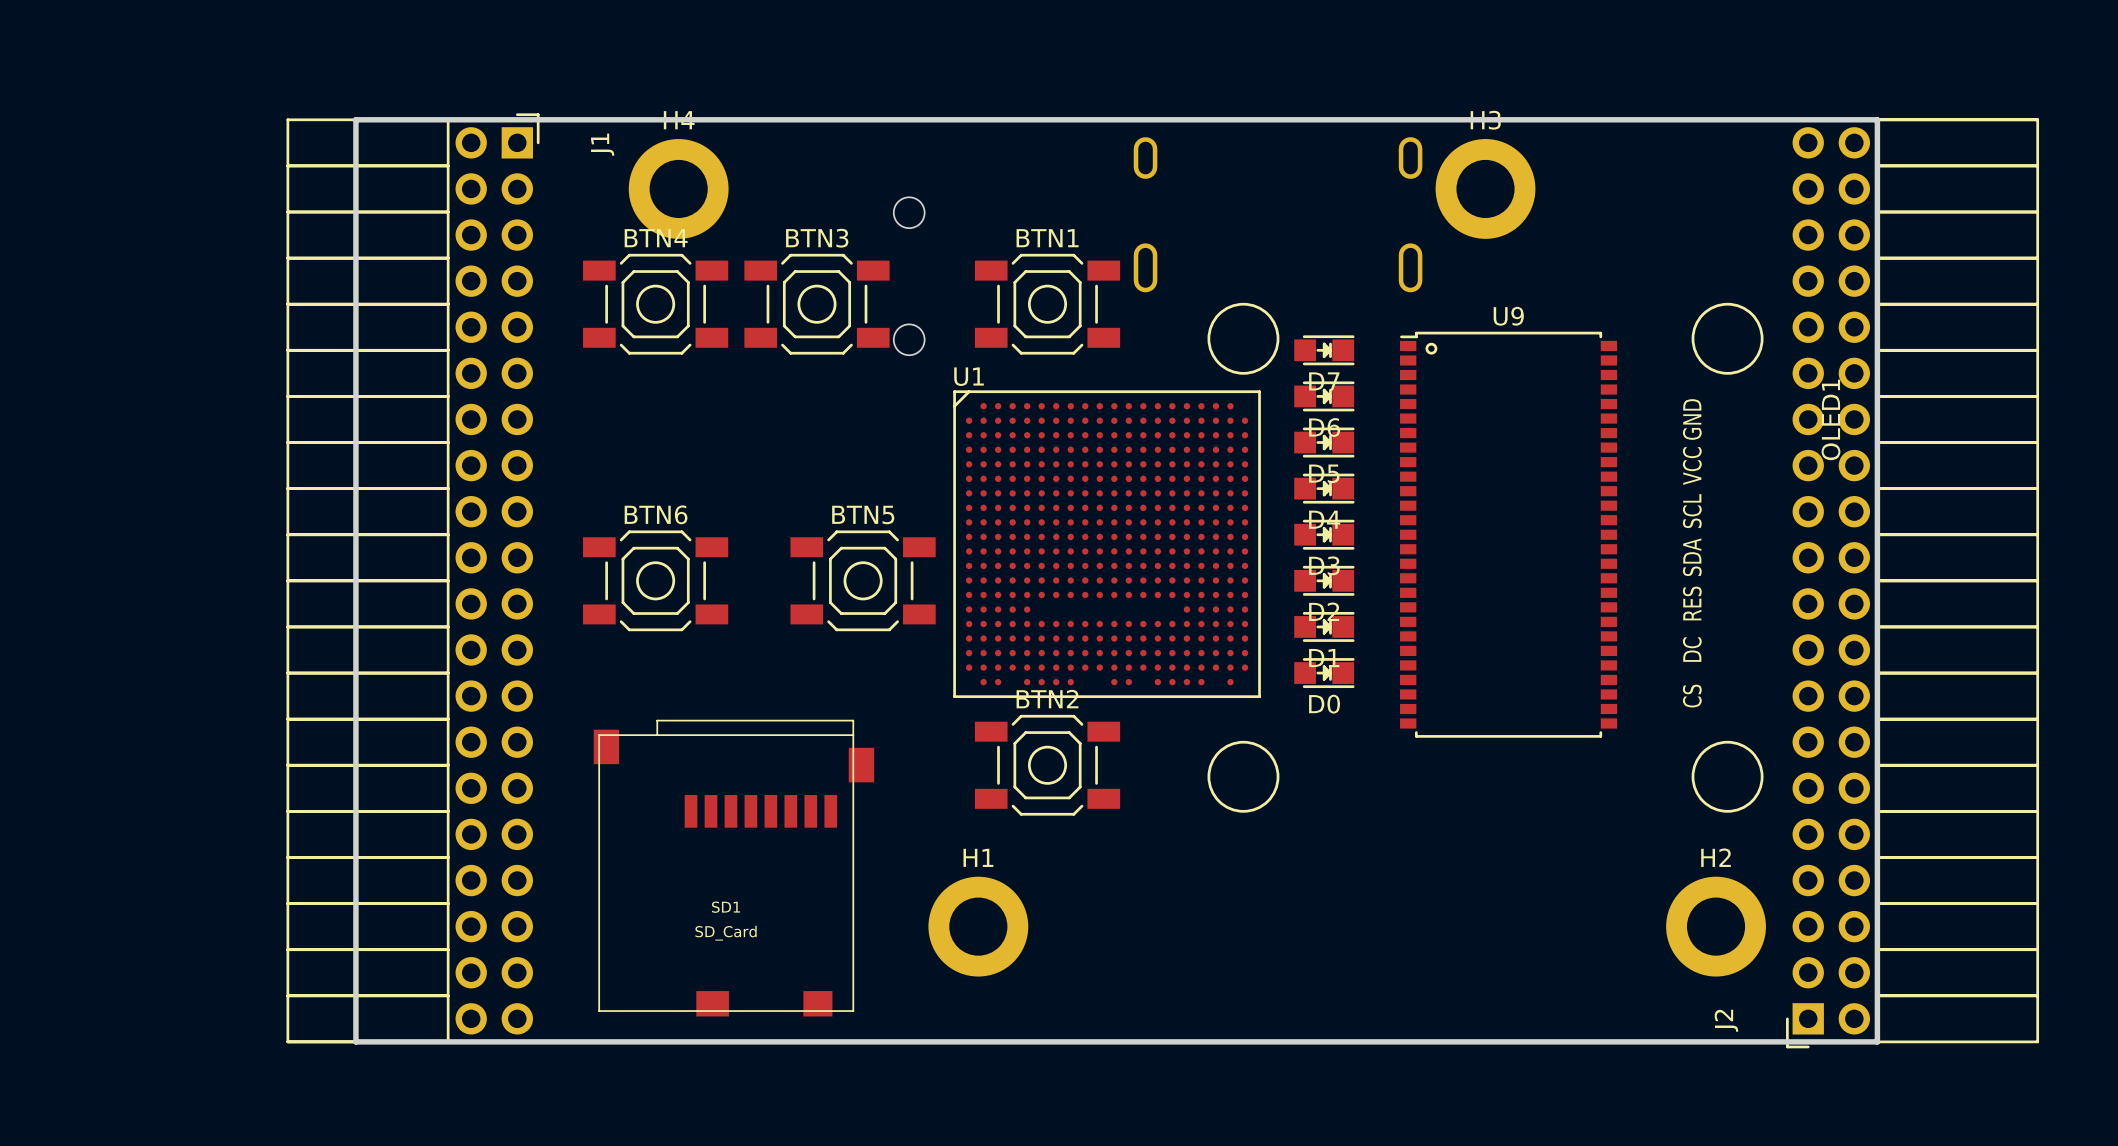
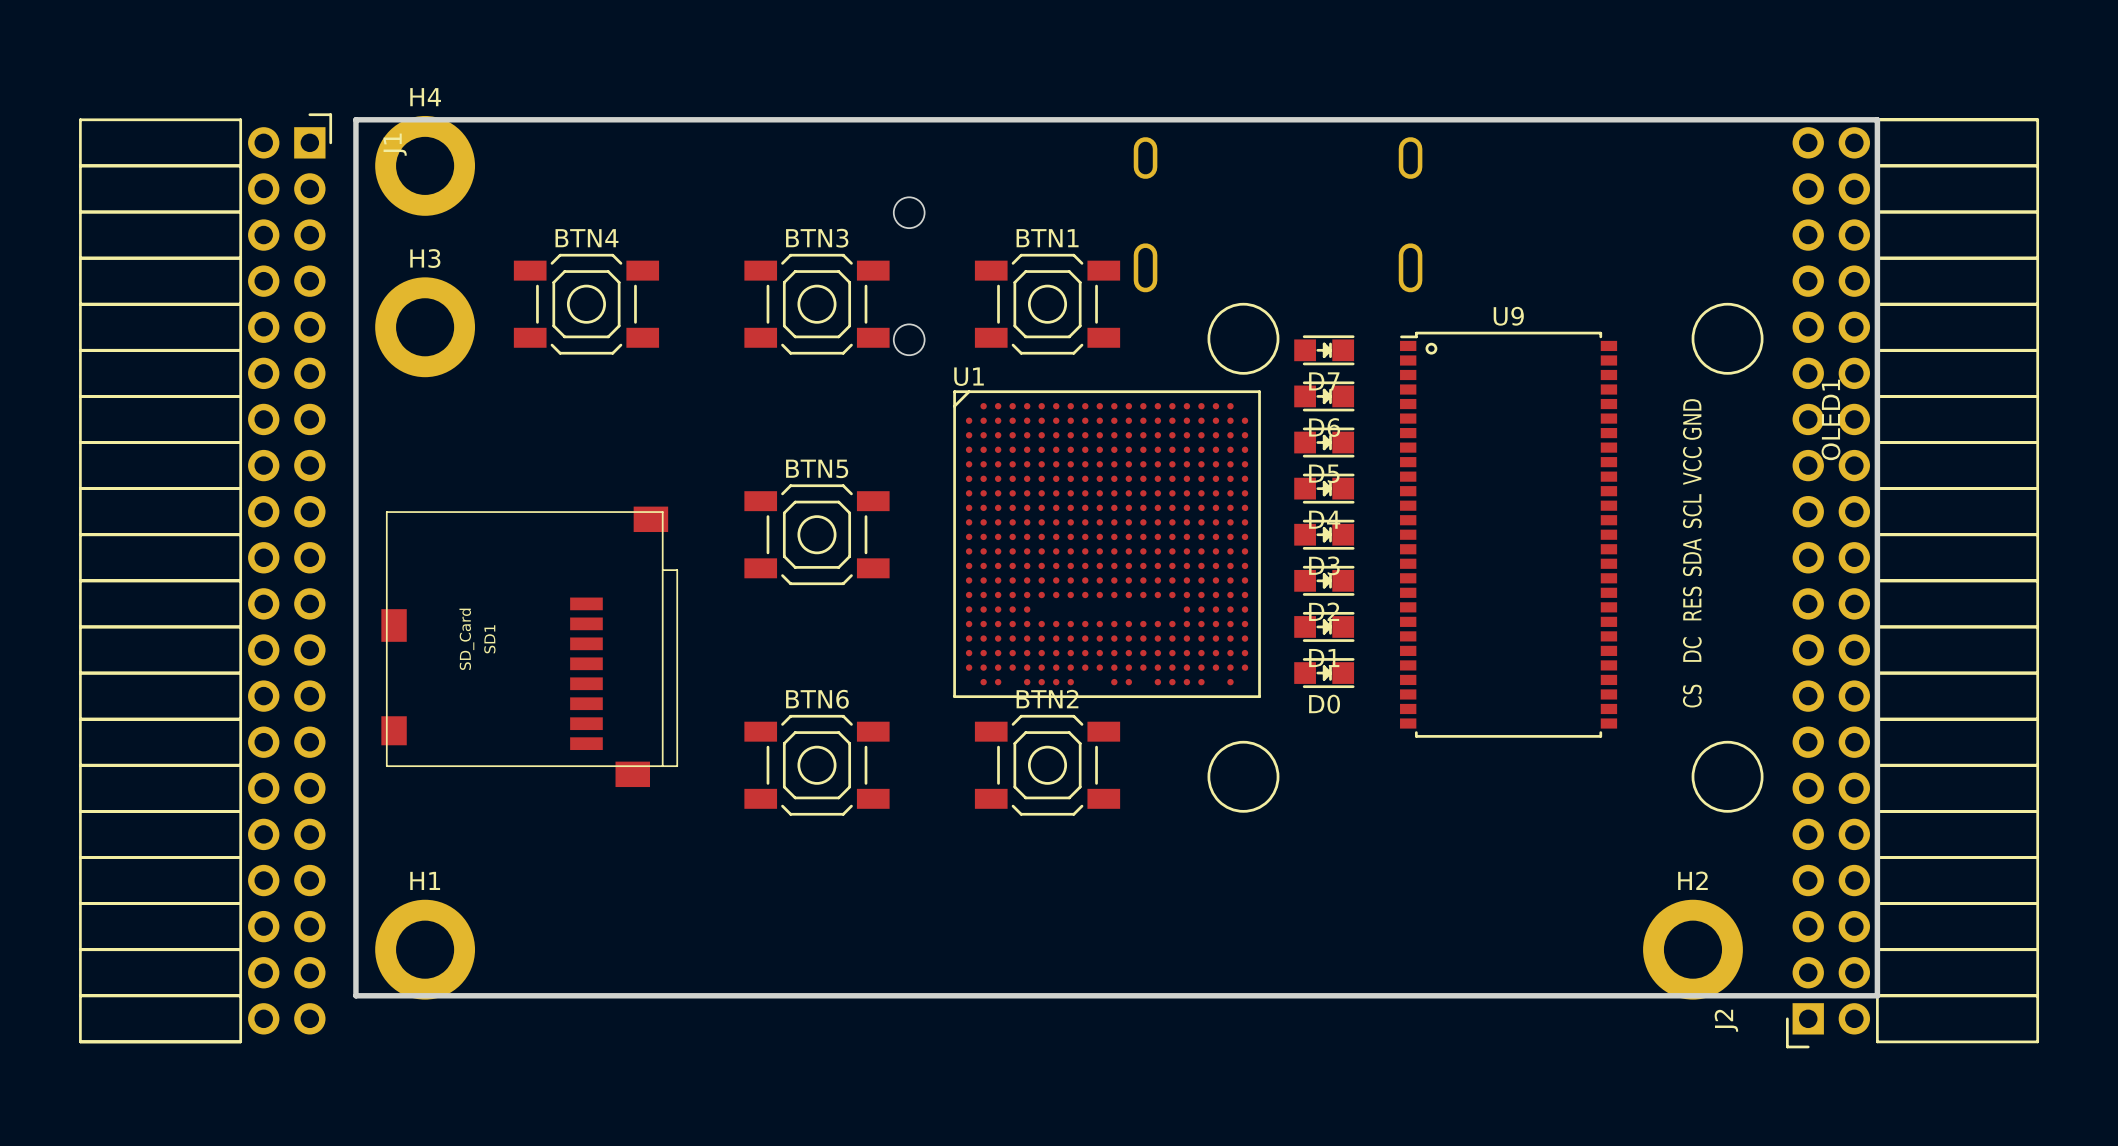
H4 position: (678, 188) -> (425, 165)
H3 position: (1485, 188) -> (425, 327)
BTN4 position: (655, 304) -> (586, 304)
J1 position: (413, 578) -> (205, 578)
BTN6 position: (655, 580) -> (816, 765)
BTN5 position: (863, 580) -> (816, 534)
SD1 rotation: 0° (733, 868) -> 90° clockwise (529, 646)
SD1 position: (733, 868) -> (529, 646)
H1 position: (978, 926) -> (425, 949)
H2 position: (1716, 926) -> (1692, 949)
board edge: (355, 995) (355, 1041) (1877, 1041) (1877, 995) -> (355, 995) (1877, 995)

